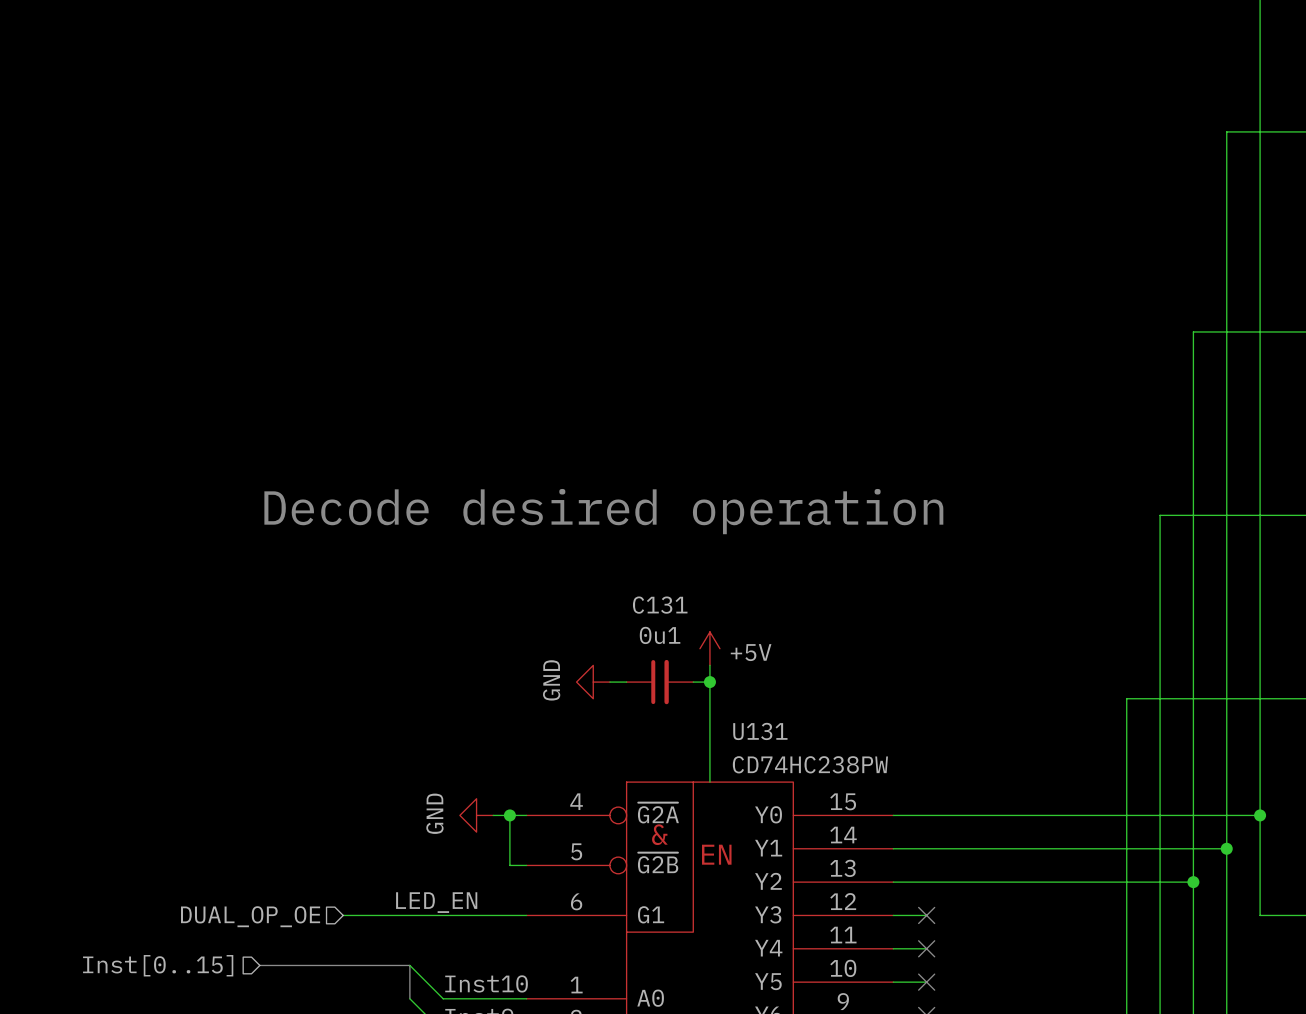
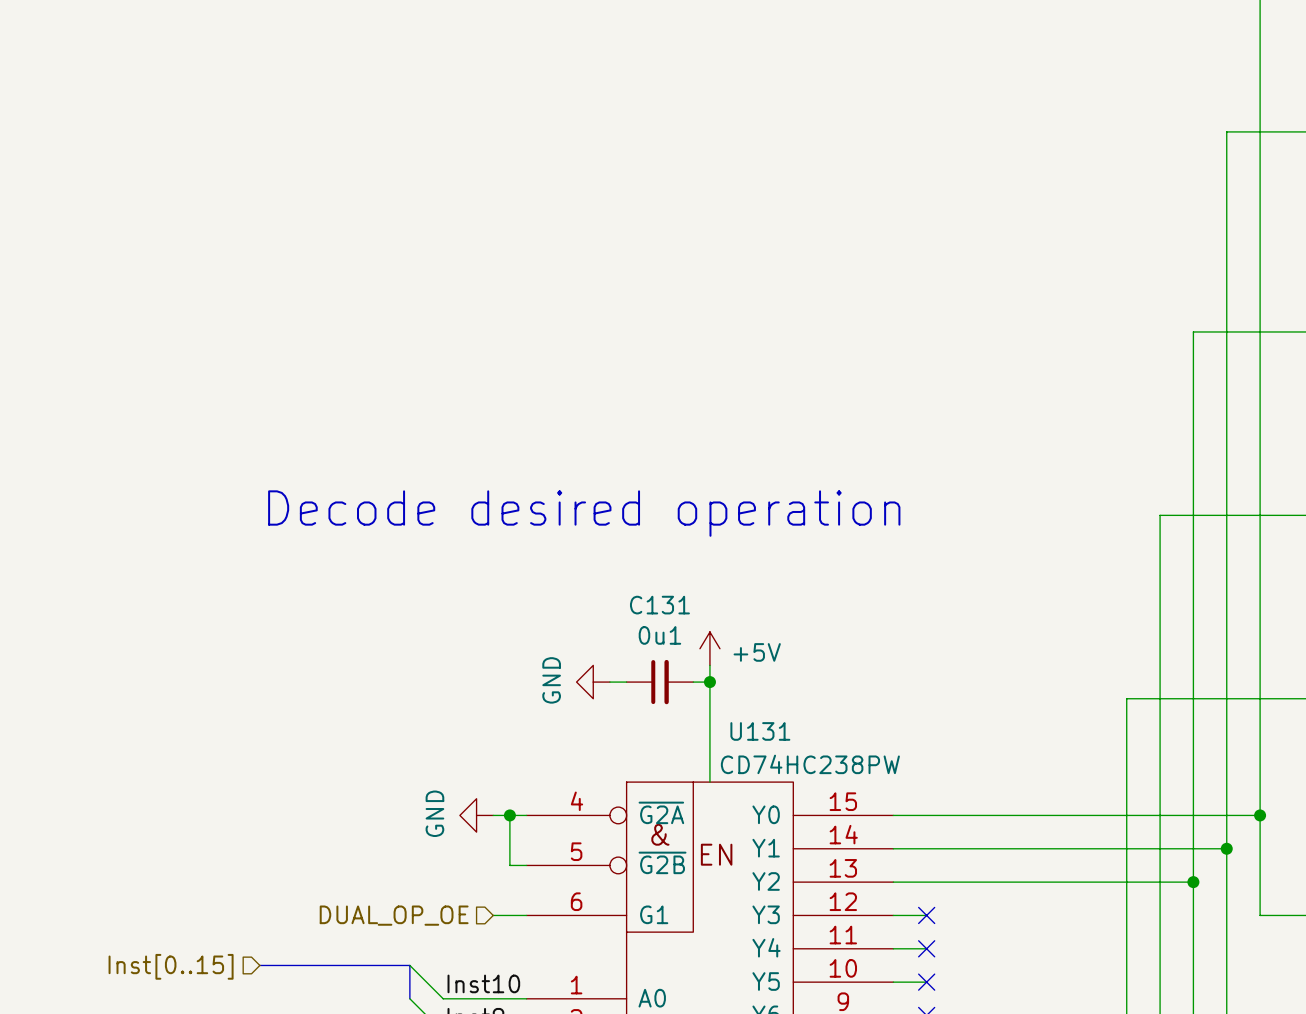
label: LED_EN (436, 902) -> none
wire: (343, 915) (493, 915) -> none
hierarchical label position: DUAL_OP_OE (250, 916) -> DUAL_OP_OE (394, 915)

